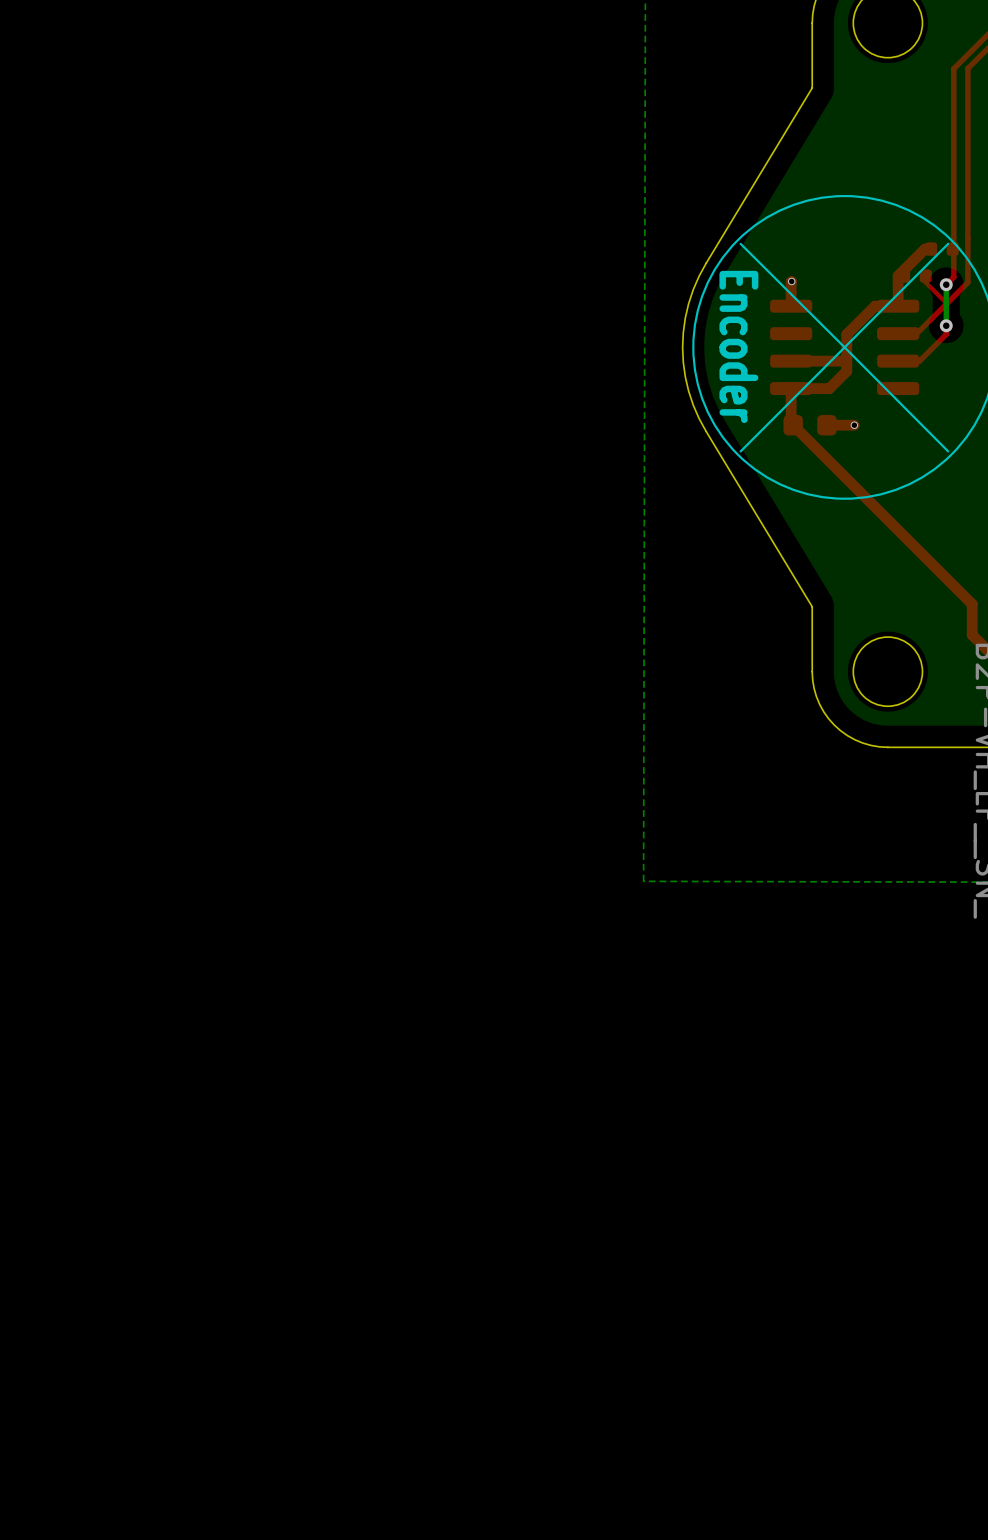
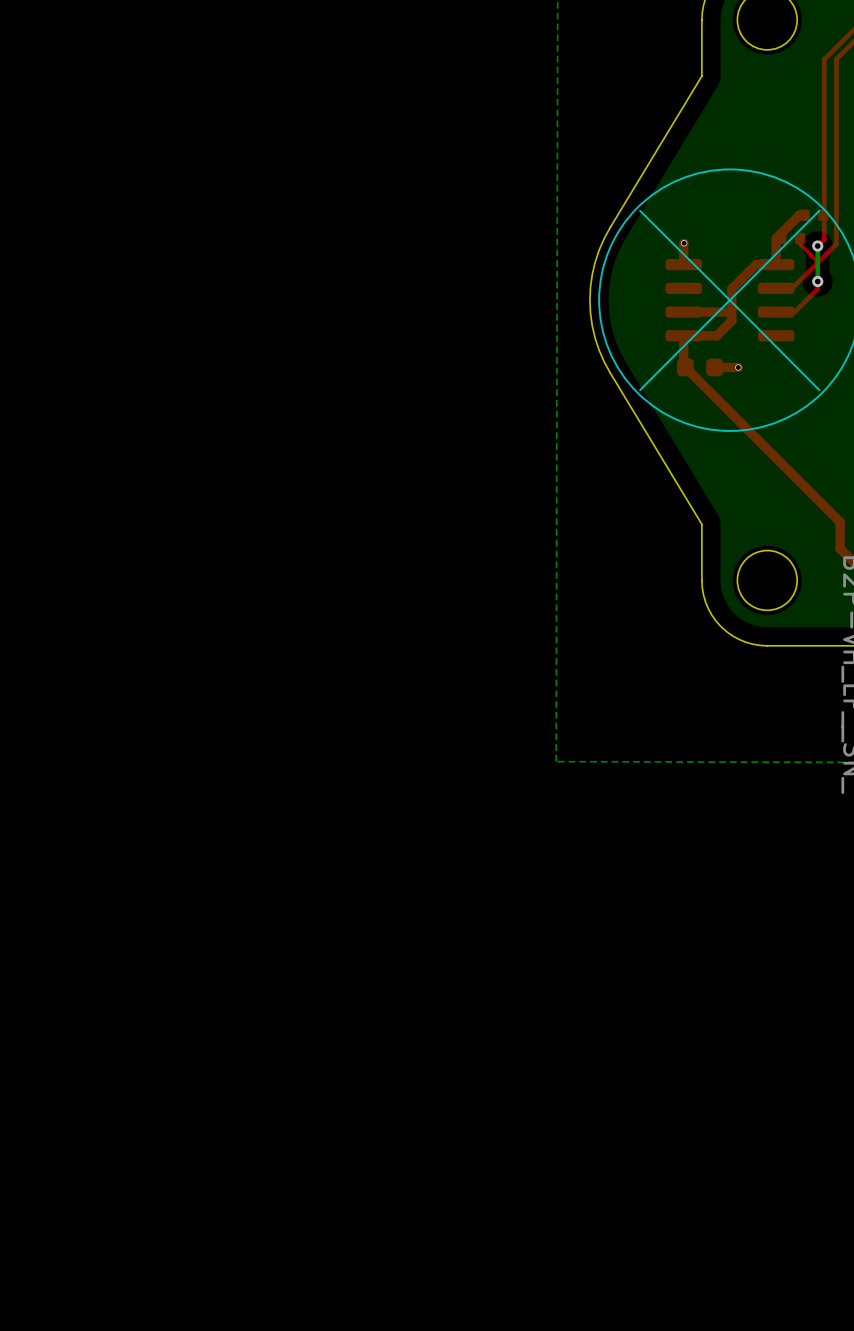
text: Encoder (738, 346) -> none

